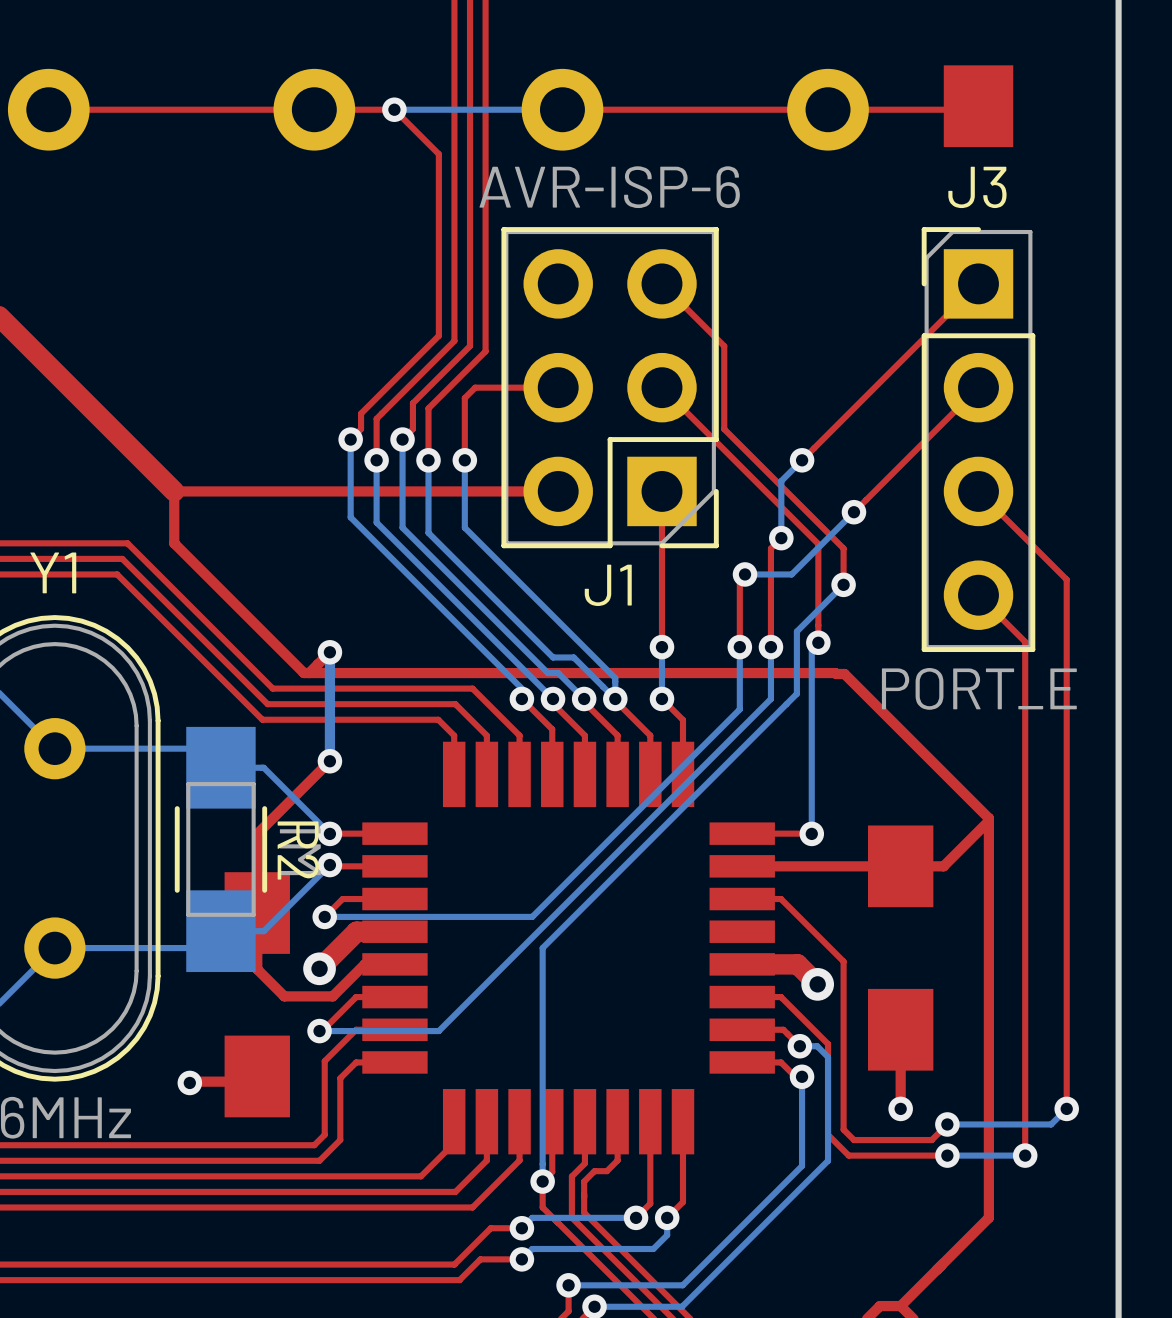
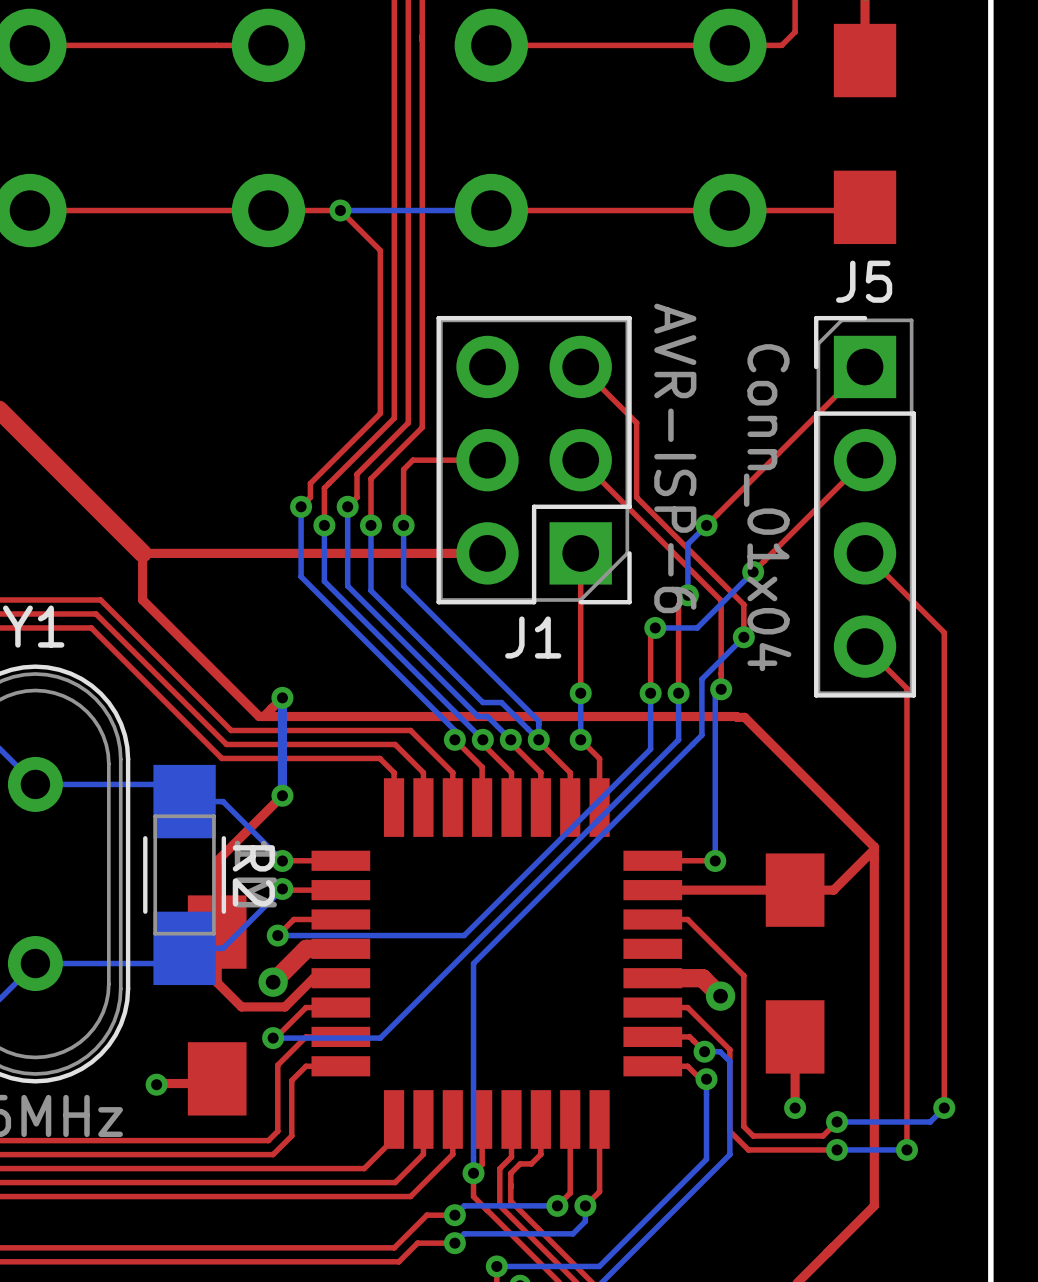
J1 value rotation: 0° (609, 187) -> 90° clockwise (675, 458)
J3 name: J3 (977, 187) -> J5 (864, 281)
J3 value: PORT_E (979, 688) -> Conn_01x04 (767, 507)

